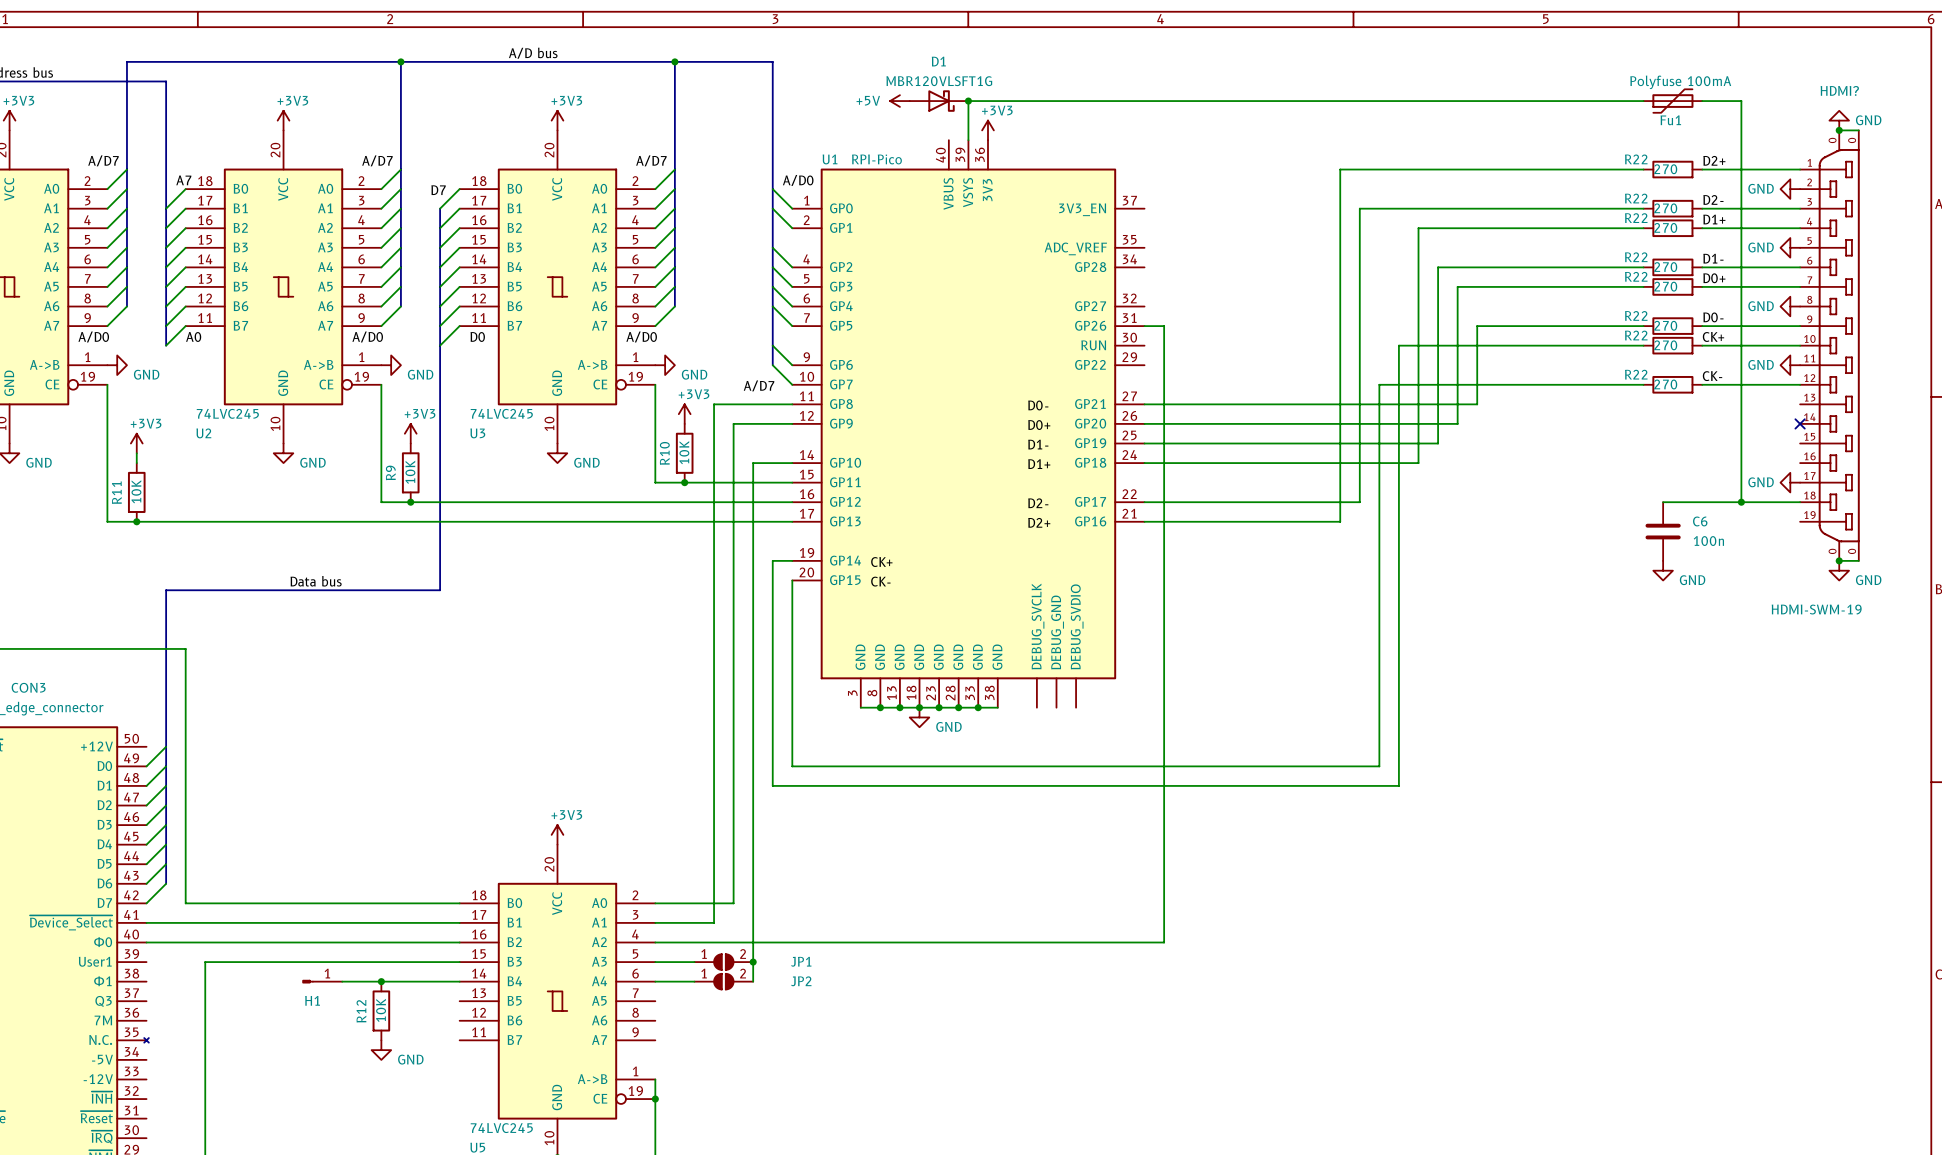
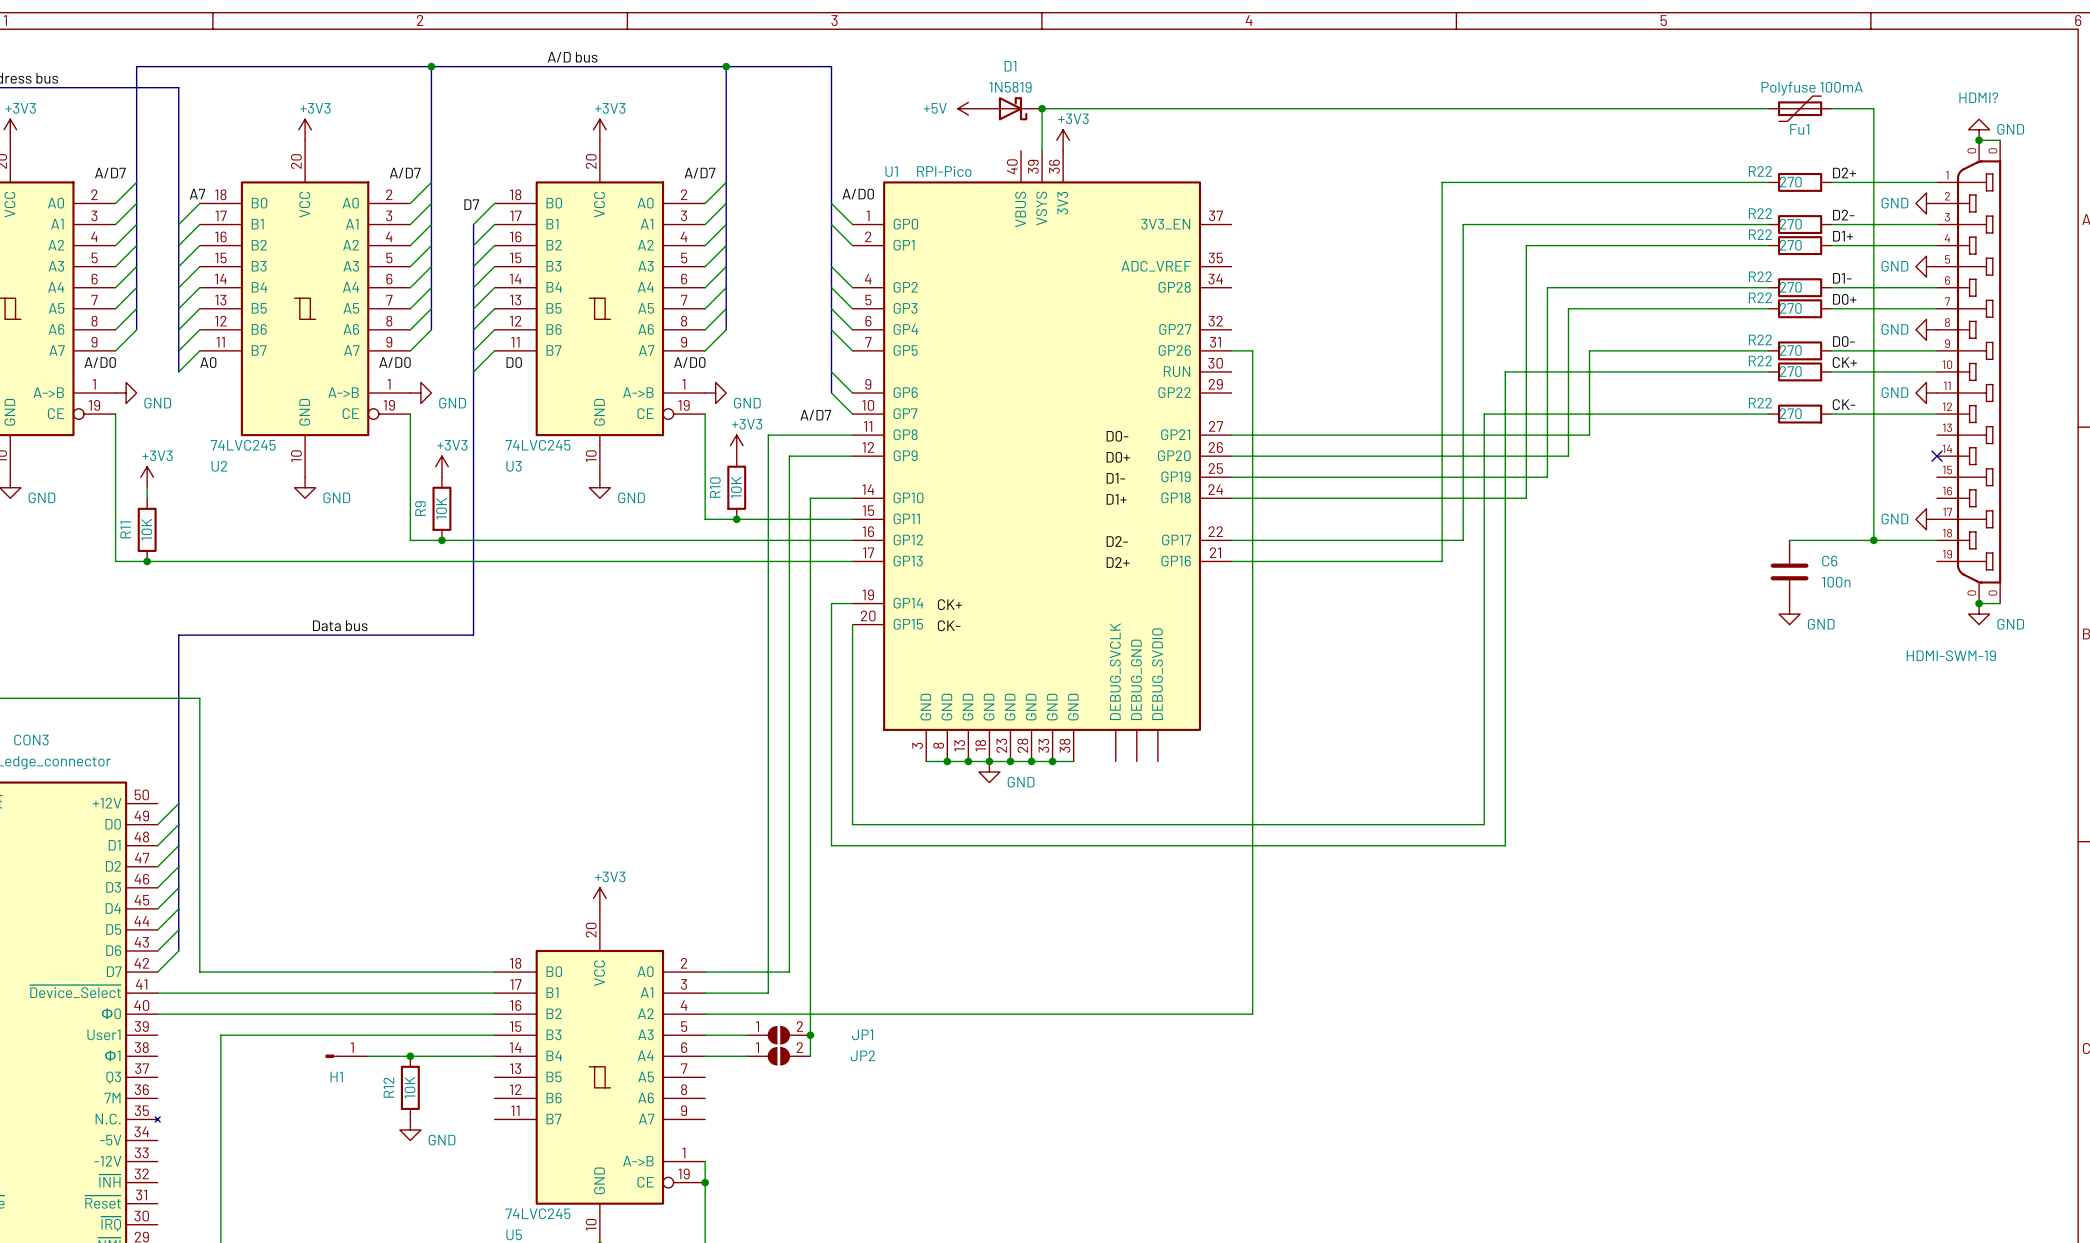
D1 value: MBR120VLSFT1G (939, 81) -> 1N5819 (1010, 87)

